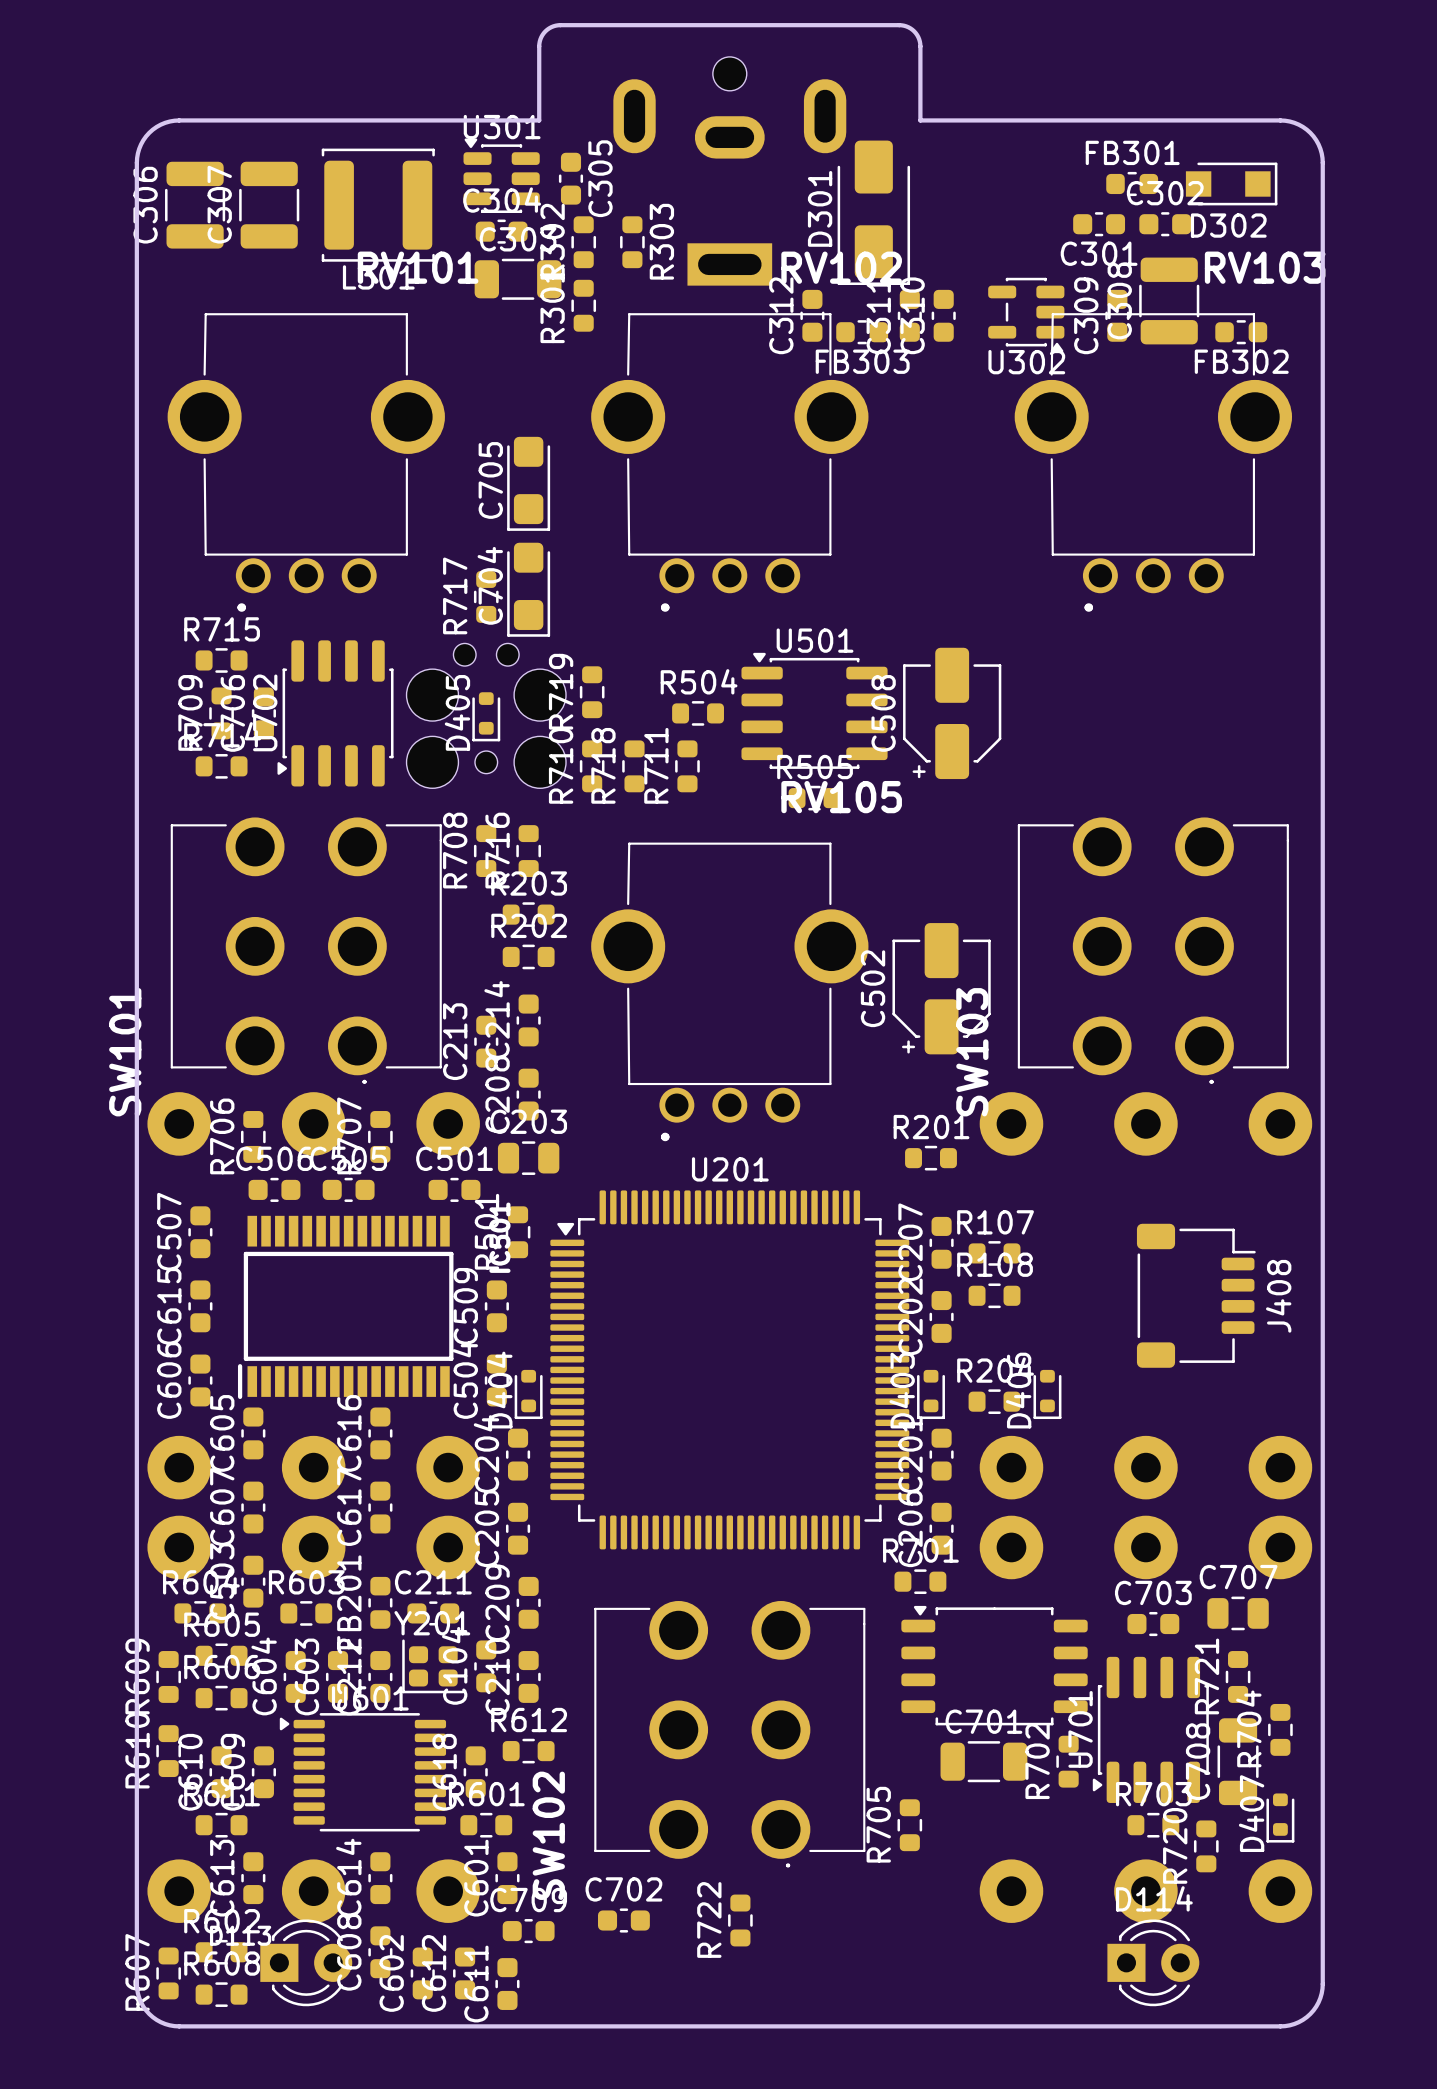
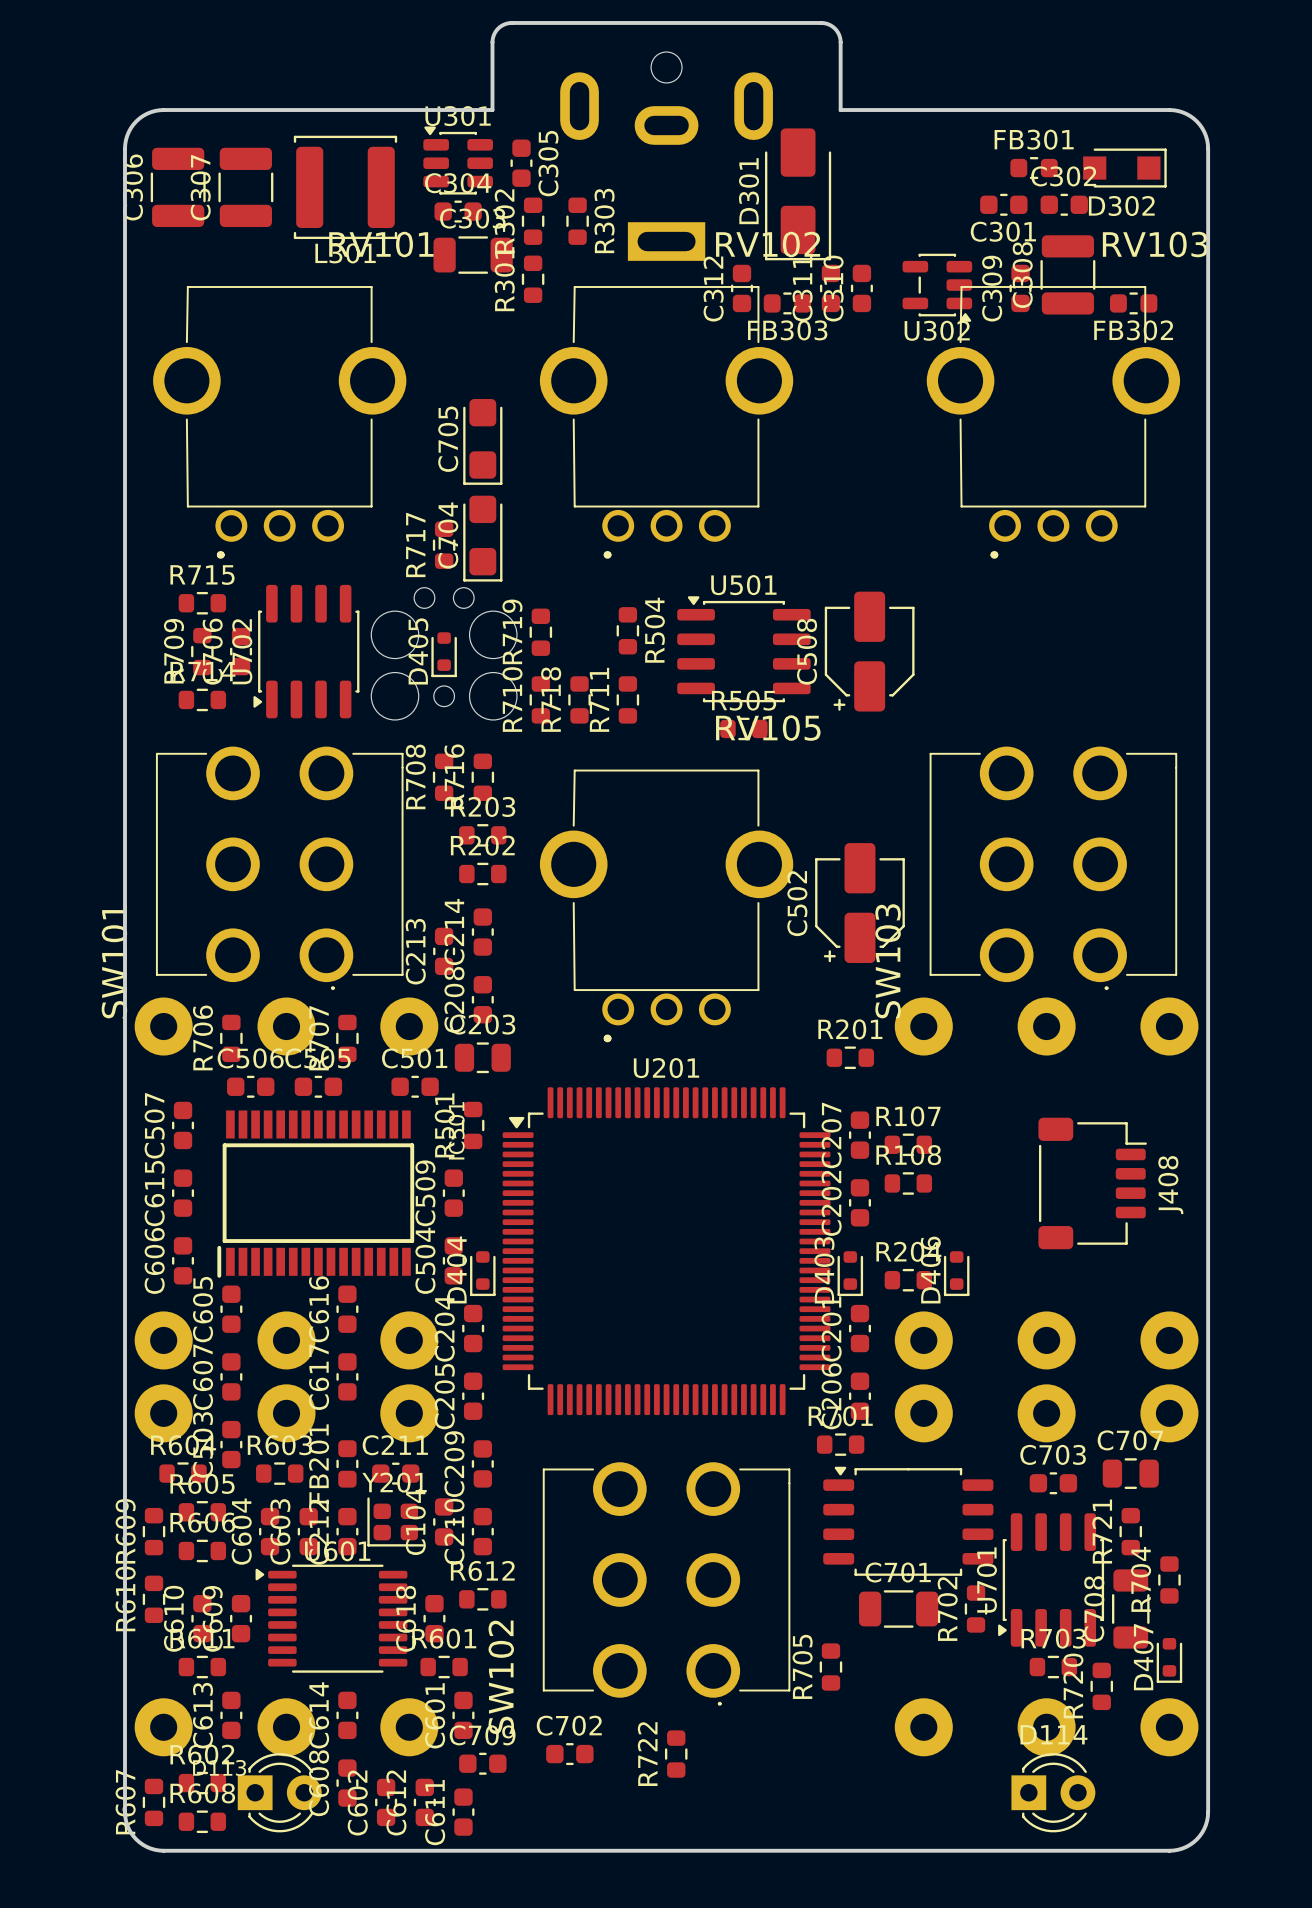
R504 rotation: 0° (698, 713) -> 90° clockwise (627, 630)

